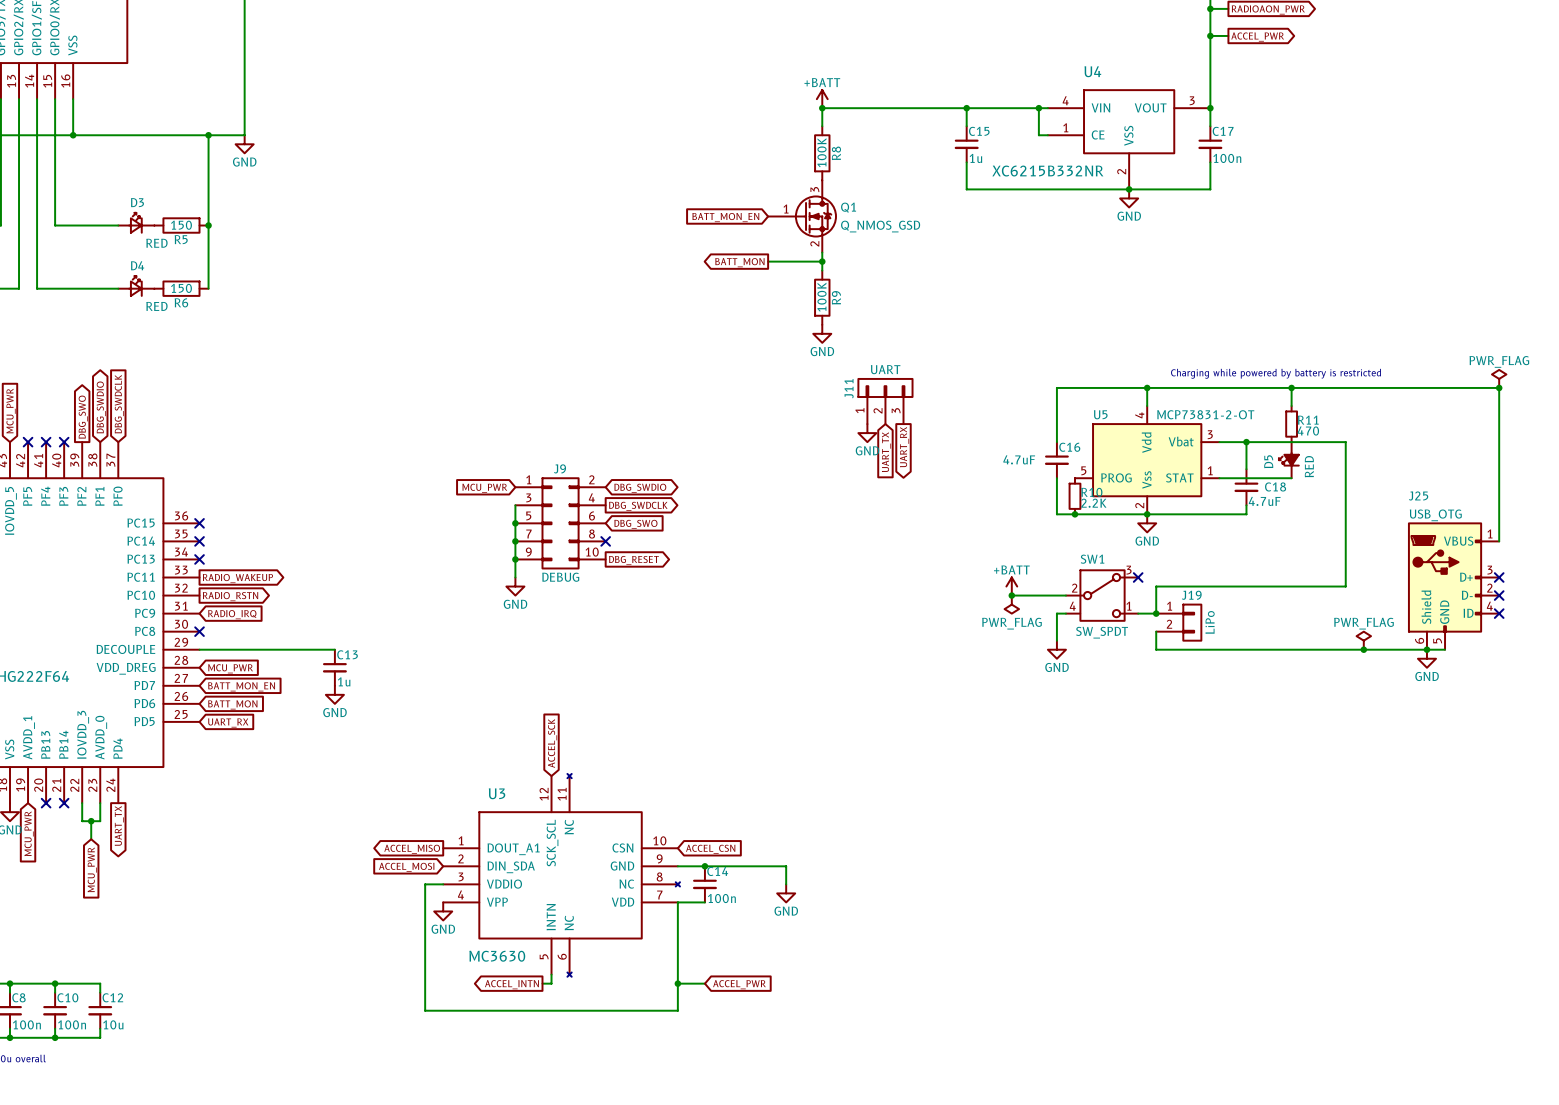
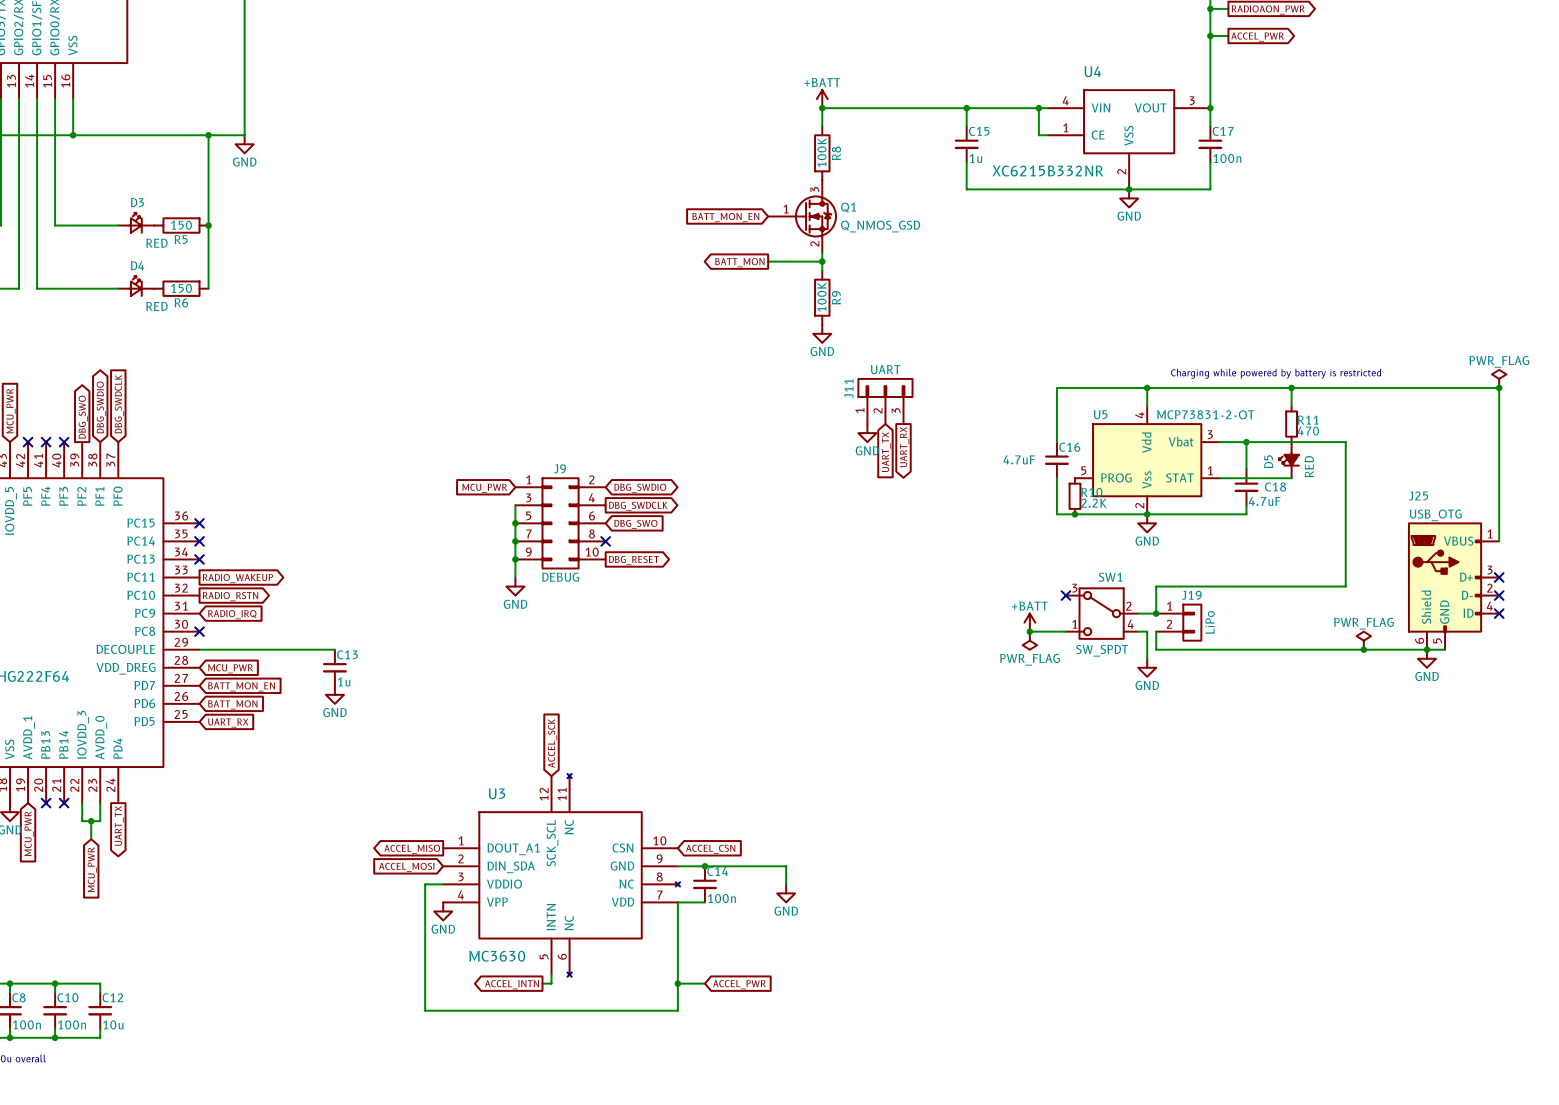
no-connect mark: (1138, 577) -> none
power symbol position: +BATT (1011, 586) -> +BATT (1029, 622)
wire: (1011, 595) (1065, 595) -> none
junction position: (1011, 595) -> (1029, 631)
no-connect mark: none -> (1065, 595)
SW1 flip: as is (1102, 595) -> left-right (1101, 613)
power symbol position: PWR_FLAG (1011, 604) -> PWR_FLAG (1029, 640)
wire: (1065, 613) (1056, 613) (1056, 640) -> none
wire: none -> (1029, 631) (1065, 631)
wire: none -> (1138, 631) (1147, 631) (1147, 658)
power symbol position: GND (1056, 649) -> GND (1147, 667)

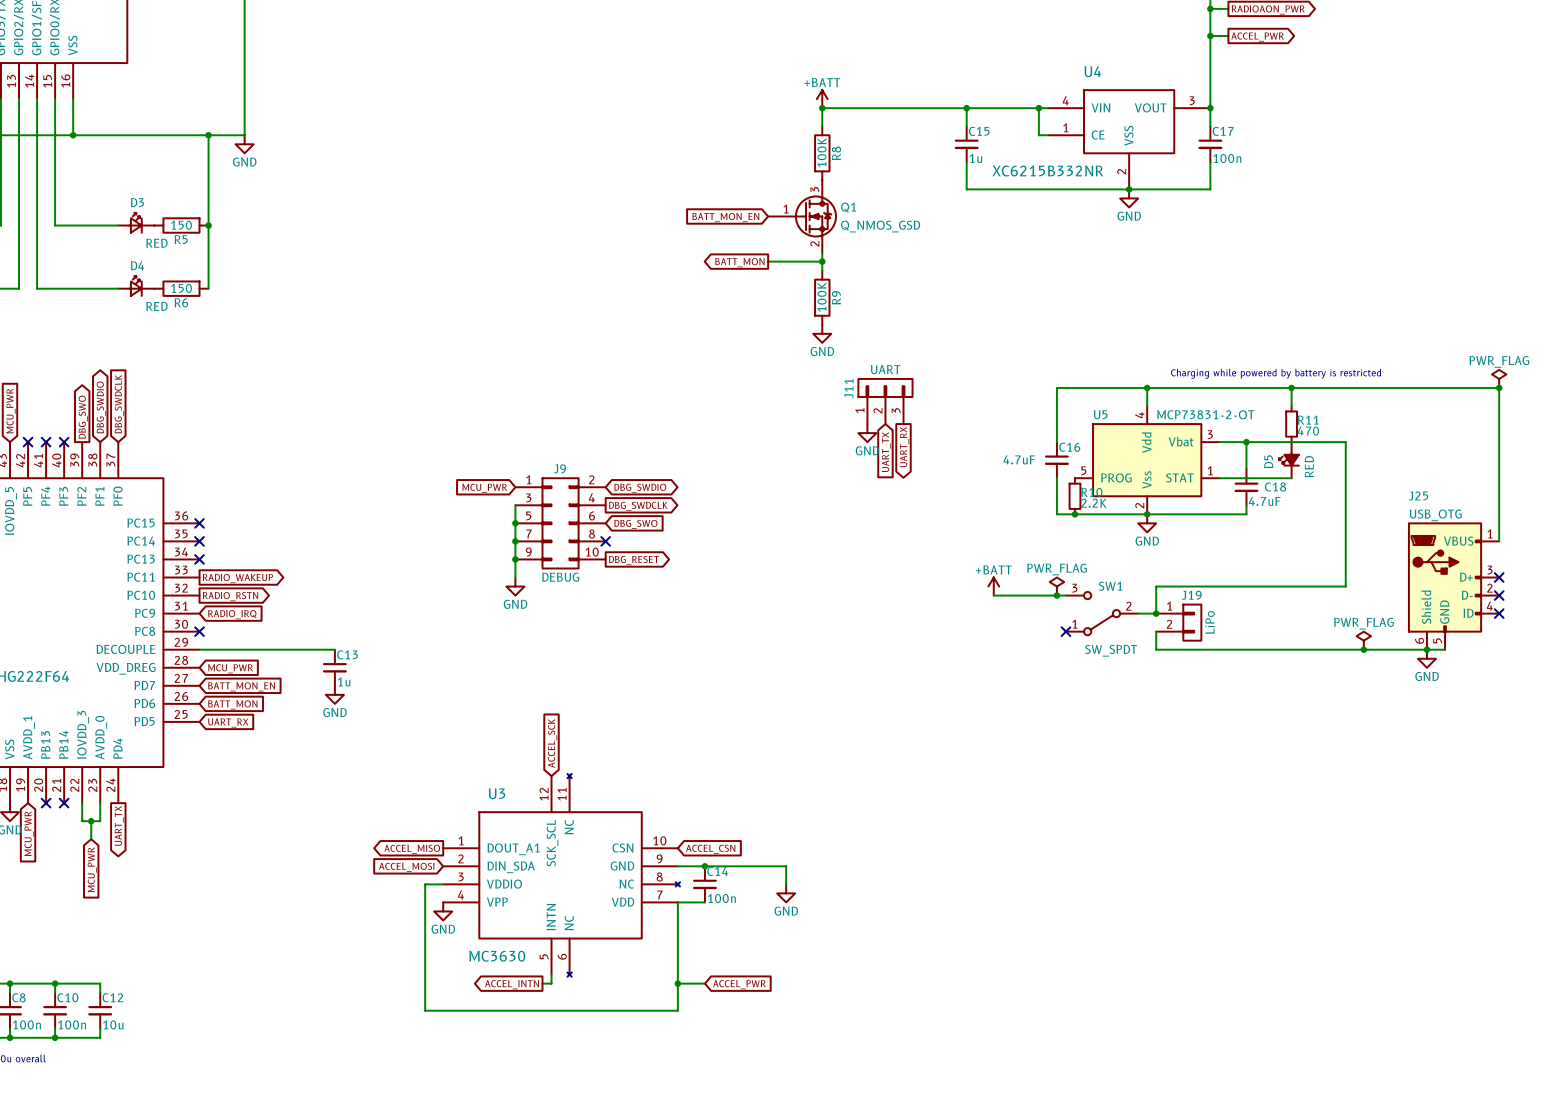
SW1 symbol: [1065, 588, 1139, 639] -> [1065, 591, 1139, 636]
wire: none -> (993, 595) (1065, 595)
junction: none -> (1056, 595)
no-connect mark position: (1065, 595) -> (1065, 631)
power symbol position: +BATT (1029, 622) -> +BATT (993, 586)
wire: (1029, 631) (1065, 631) -> none
junction: (1029, 631) -> none
wire: (1138, 631) (1147, 631) (1147, 658) -> none
power symbol rotation: 0° (1029, 640) -> 180° (1056, 586)
power symbol position: PWR_FLAG (1029, 640) -> PWR_FLAG (1056, 586)
power symbol: GND (1147, 667) -> none

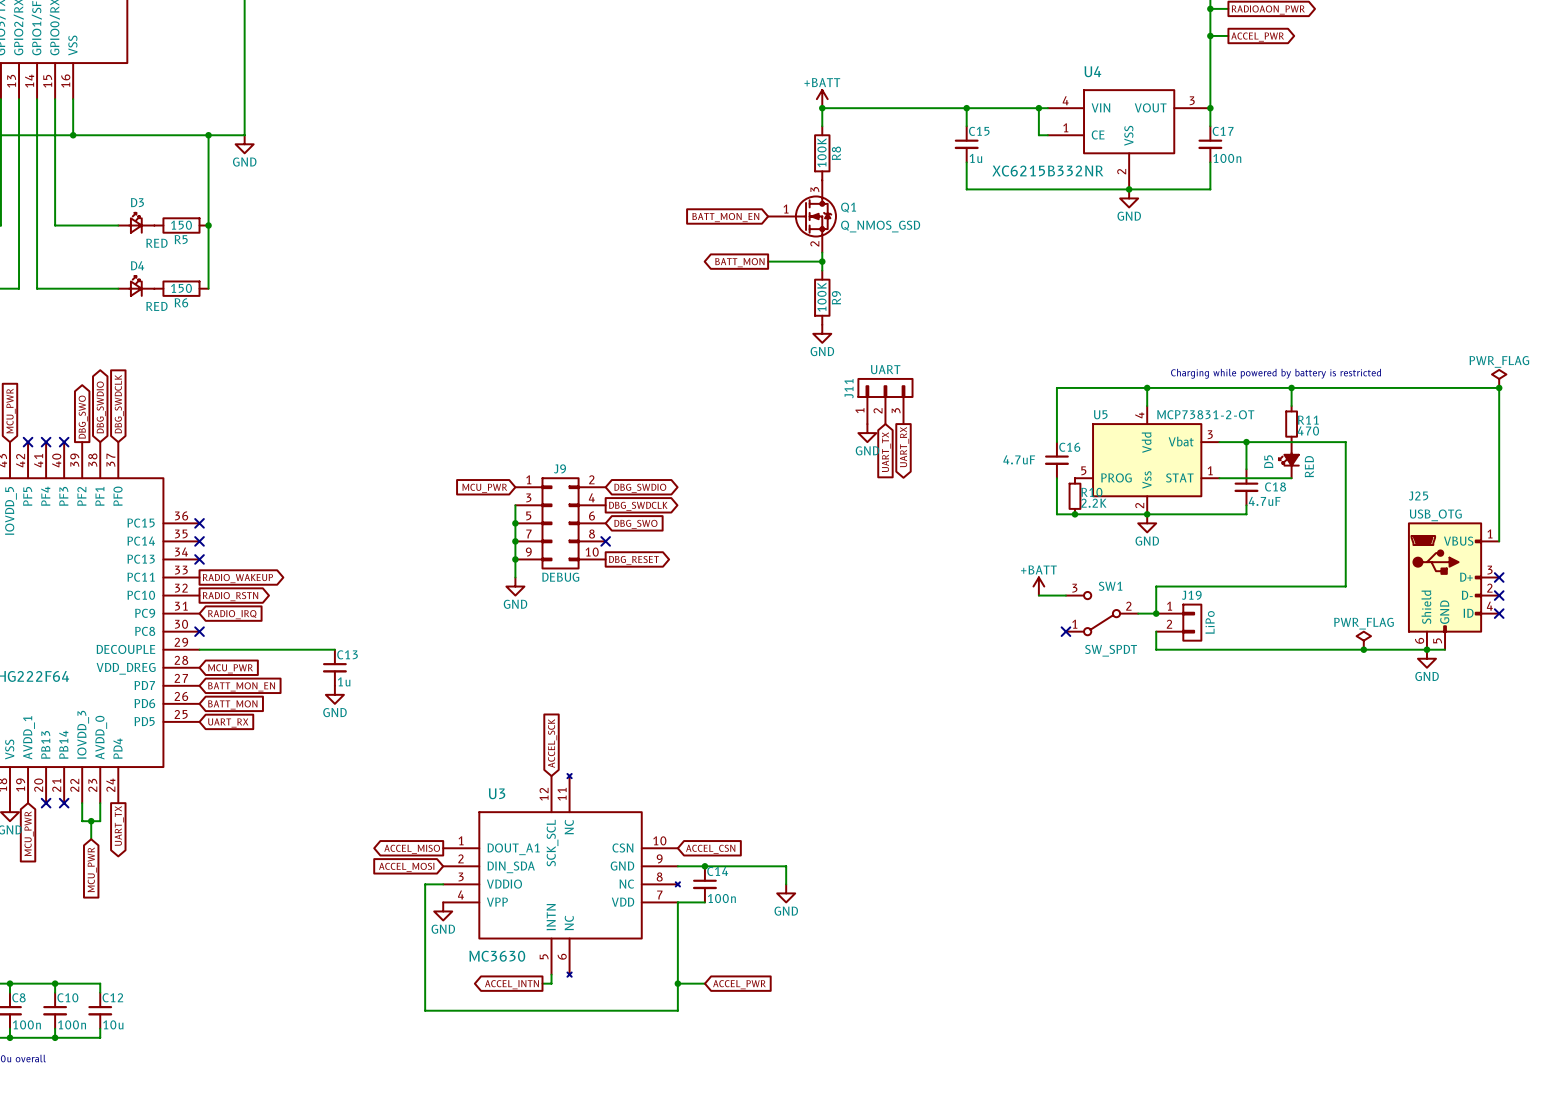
power symbol position: +BATT (993, 586) -> +BATT (1038, 586)
power symbol: PWR_FLAG (1056, 586) -> none
wire: (993, 595) (1038, 595) -> none
junction: (1056, 595) -> none

